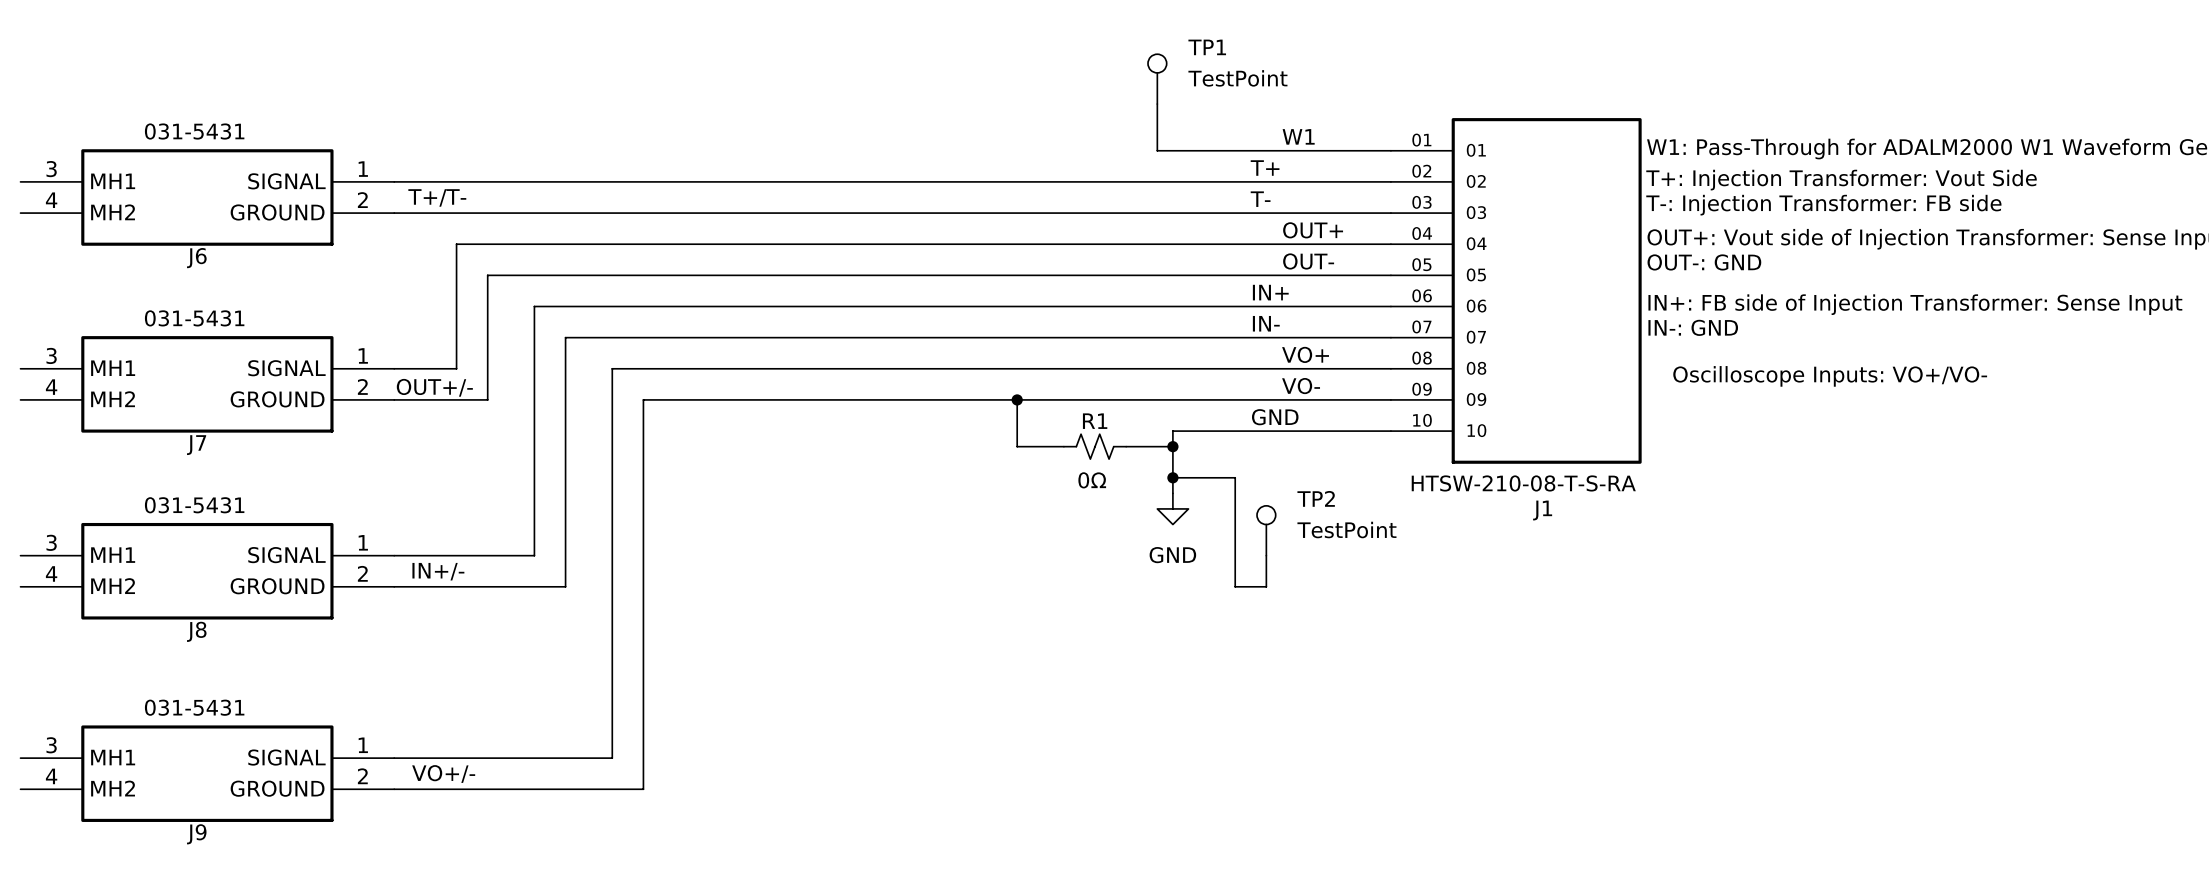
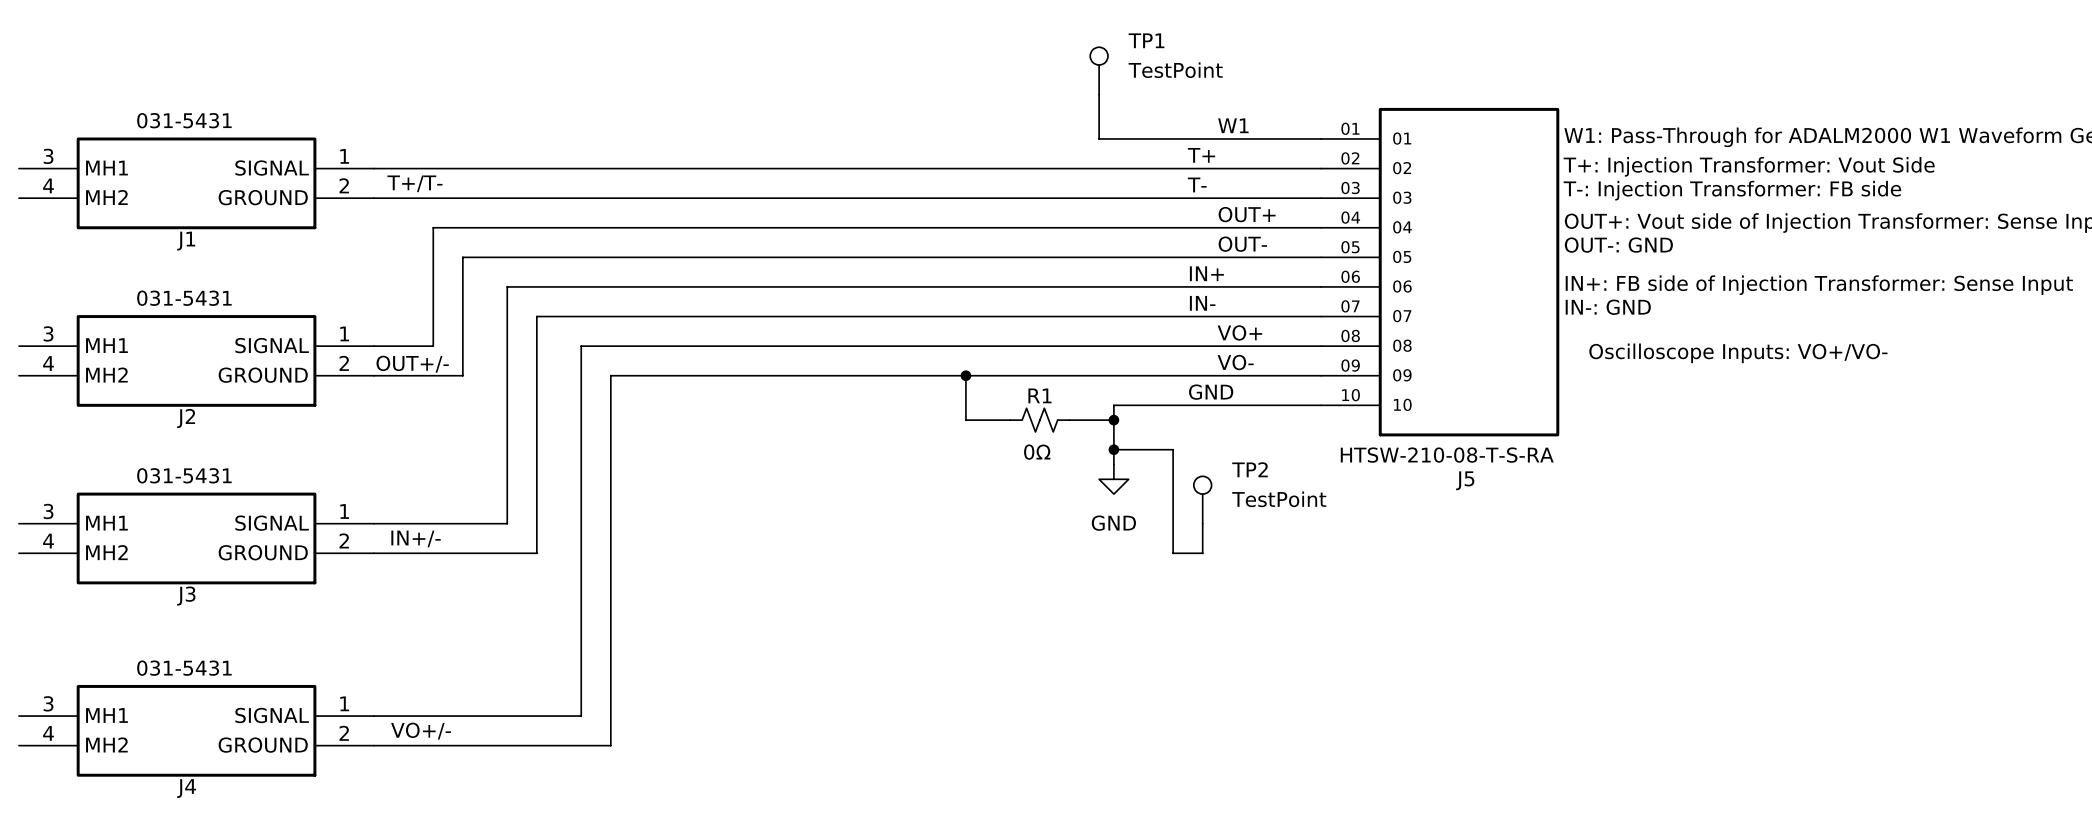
J6 name: J6 (196, 258) -> J1 (186, 241)
J7 name: J7 (196, 445) -> J2 (186, 418)
J1 name: J1 (1542, 510) -> J5 (1465, 480)
J8 name: J8 (196, 631) -> J3 (186, 596)
J9 name: J9 (196, 834) -> J4 (186, 788)

